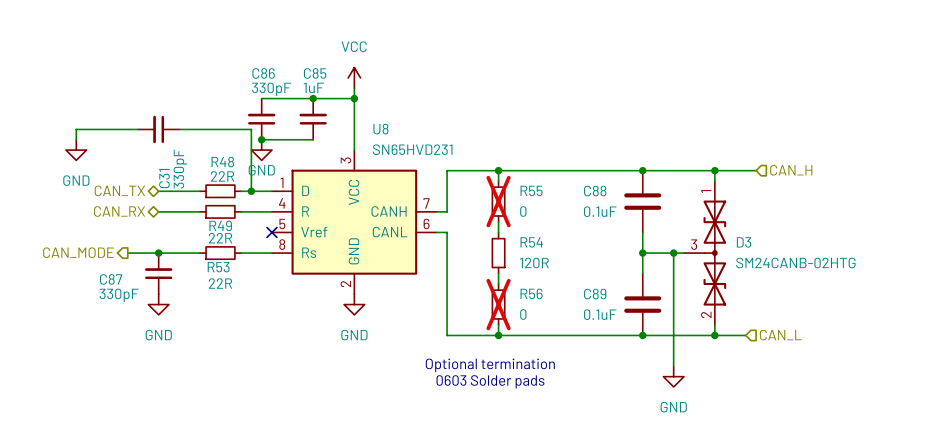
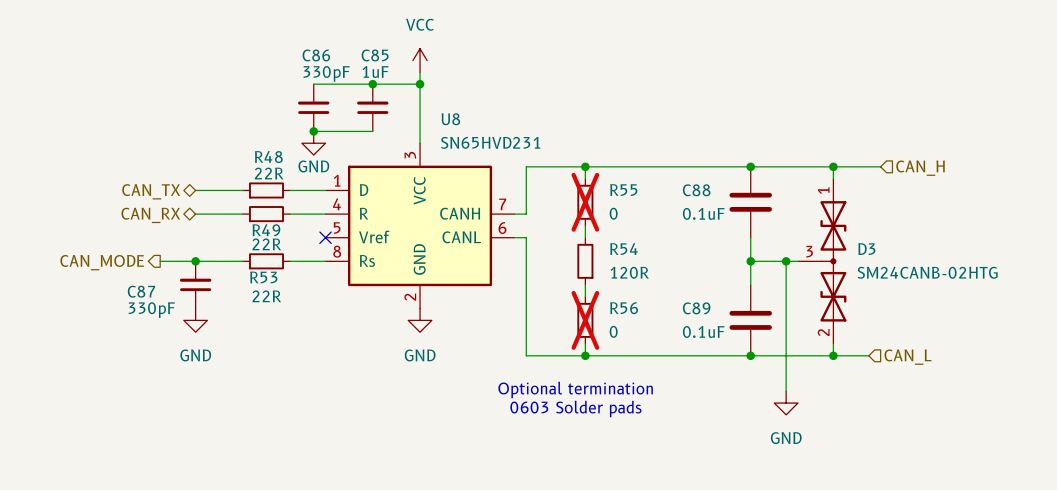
wire: (138, 129) (76, 129) (76, 139) -> none
C31: 330pF (158, 129) -> none
wire: (179, 129) (251, 129) (251, 191) -> none
power symbol: GND (76, 150) -> none
junction: (251, 191) -> none

